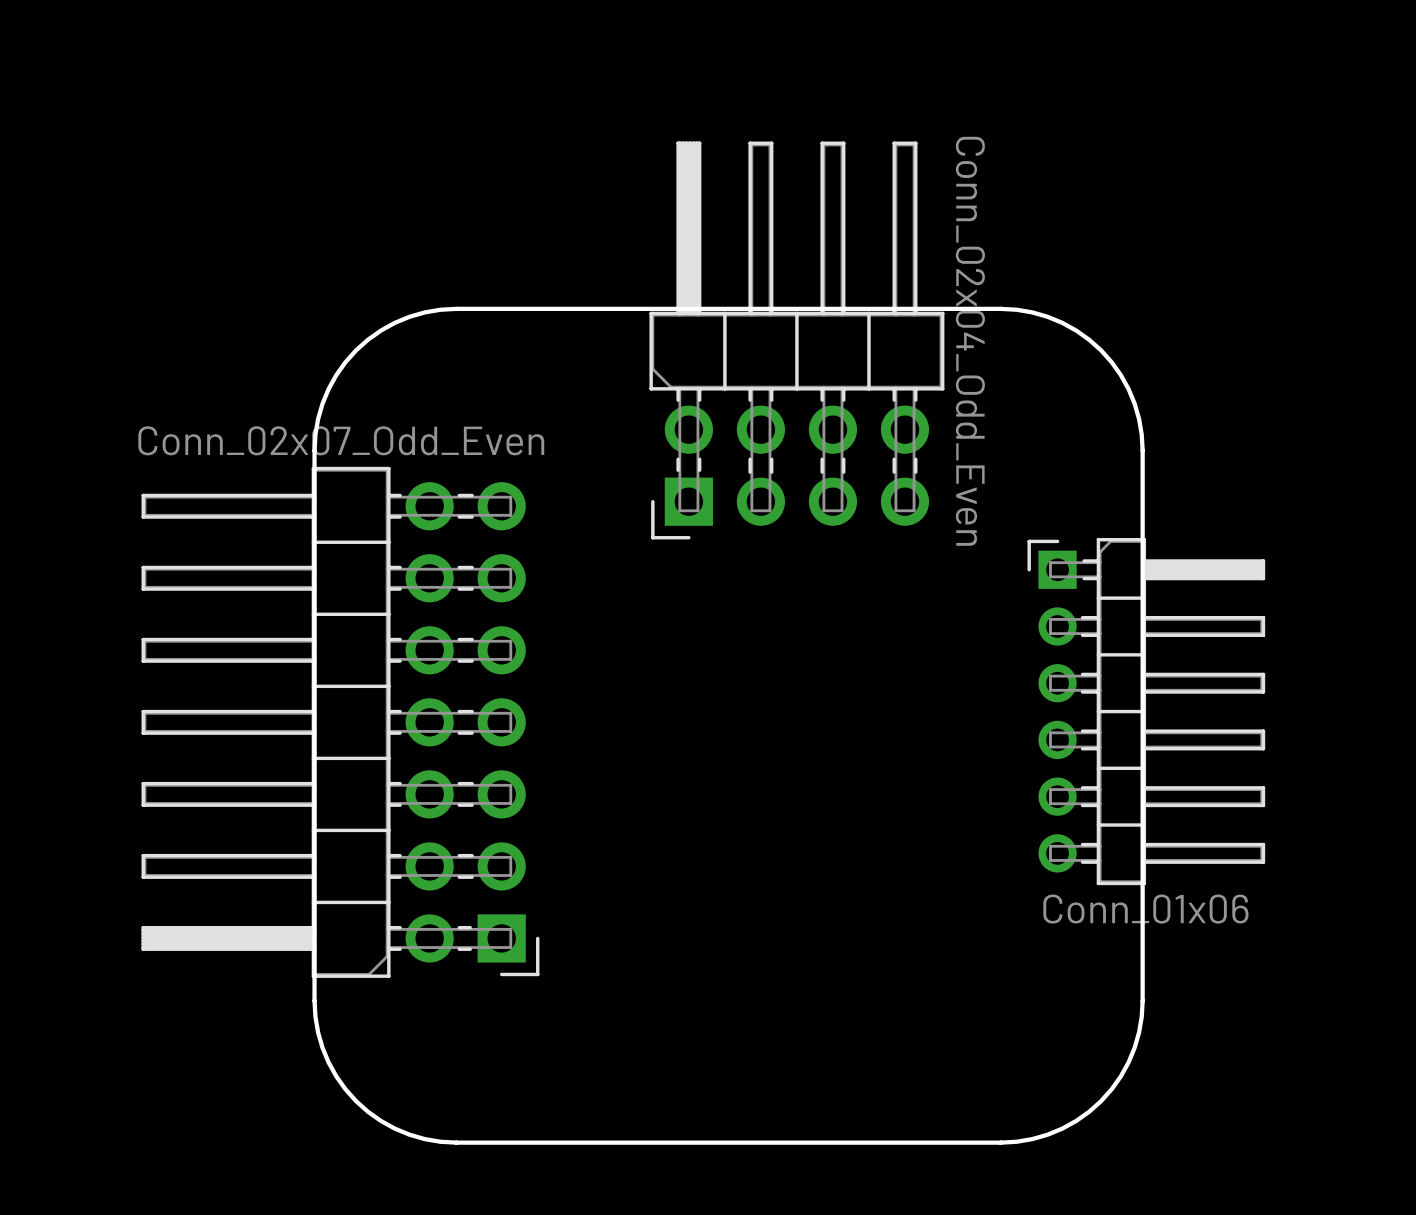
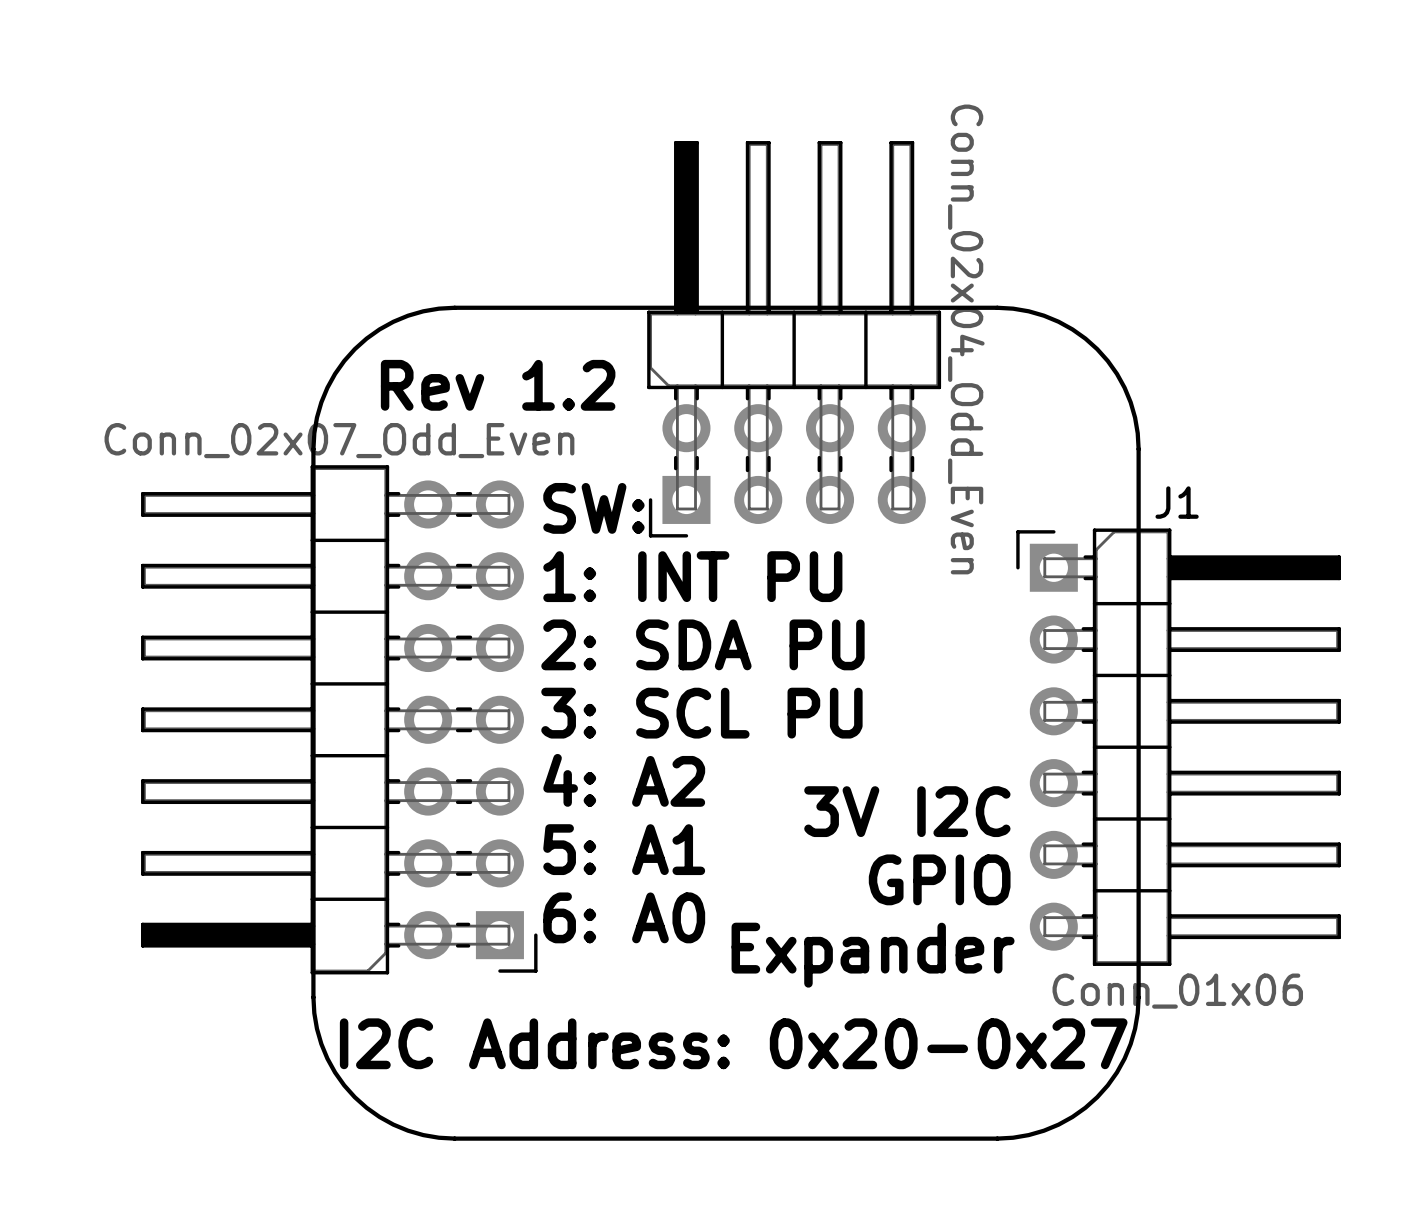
text: none -> Rev 1.2 (498, 385)
text: none -> SW: (593, 508)
text: none -> 1: INT PU (692, 576)
text: none -> 2: SDA PU (702, 644)
part: Conn_01x06 (1146, 711) -> none
text: none -> 3: SCL PU (701, 713)
J1: none -> Conn_01x06 (1178, 747)
text: none -> 4: A2 (624, 780)
text: none -> 3V I2C (907, 811)
text: none -> 5: A1 (624, 849)
text: none -> GPIO (939, 879)
text: none -> 6: A0 (624, 917)
text: none -> Expander (873, 955)
text: none -> I2C Address: 0x20-0x27 (733, 1043)

